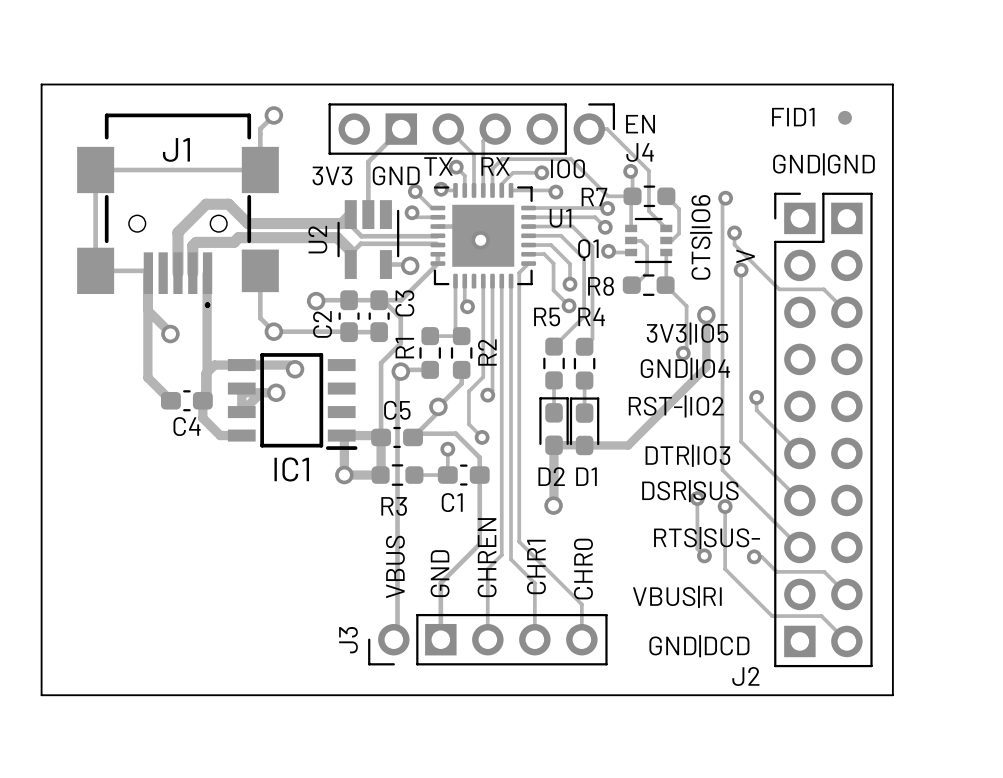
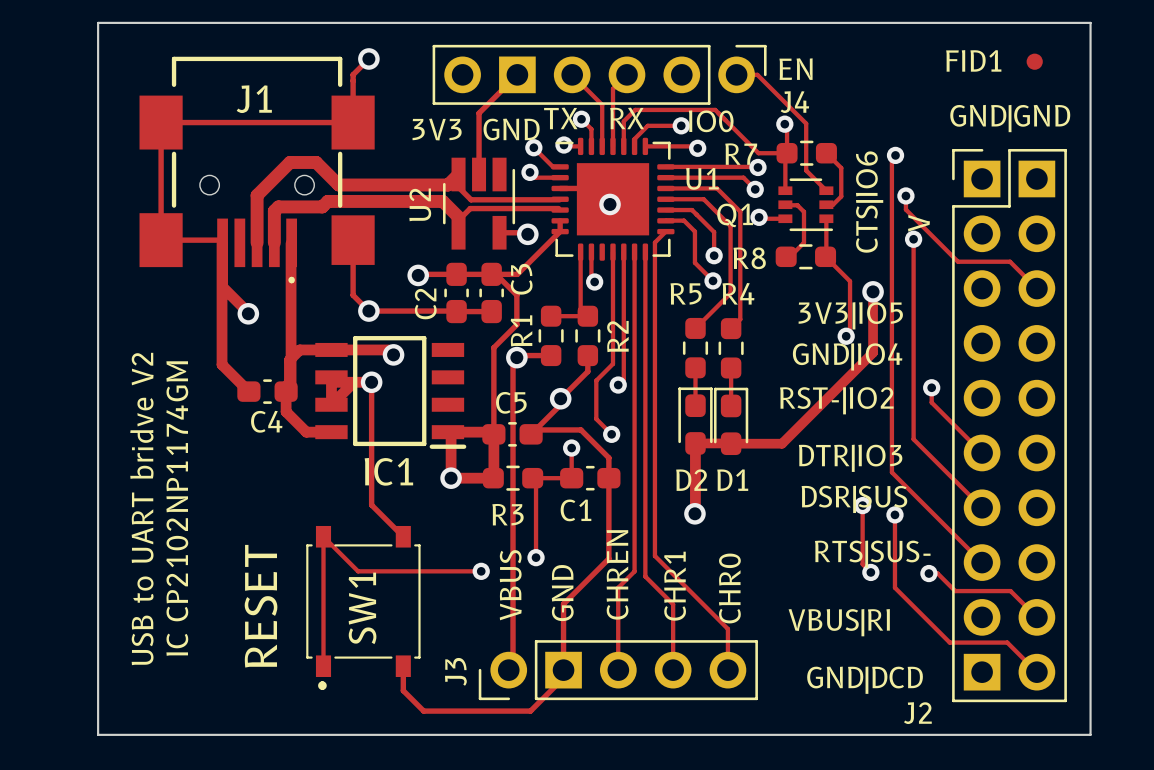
track: none -> (371, 382) (371, 505) (403, 536)
track: none -> (532, 478) (536, 481) (536, 557)
text: none -> USB to UART bridve V2 (141, 508)
text: none -> IC CP2102NP1174GM (177, 508)
via: none -> (536, 557)
track: none -> (481, 571) (358, 571) (323, 536) (323, 666)
via: none -> (481, 571)
text: none -> RESET (261, 606)
SW1: none -> (363, 607)
track: none -> (403, 666) (403, 690) (423, 711) (530, 711) (563, 678) (563, 670)

